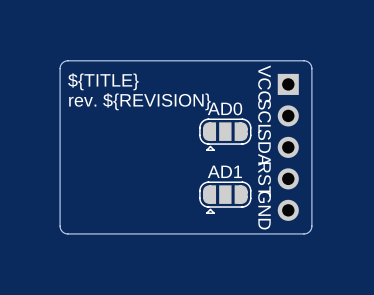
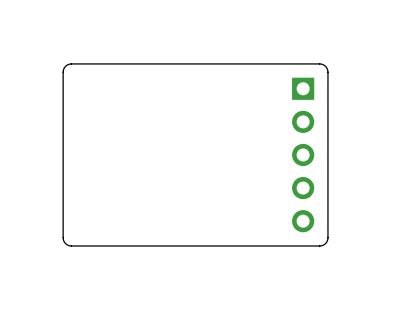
text: ${TITLE} (103, 81) -> none
text: VCC (264, 84) -> none
text: rev. ${REVISION} (139, 101) -> none
text: SCL (264, 116) -> none
AD0: (225, 134) -> none
text: SDA (264, 147) -> none
text: RST (264, 179) -> none
AD1: (225, 197) -> none
text: GND (264, 210) -> none

